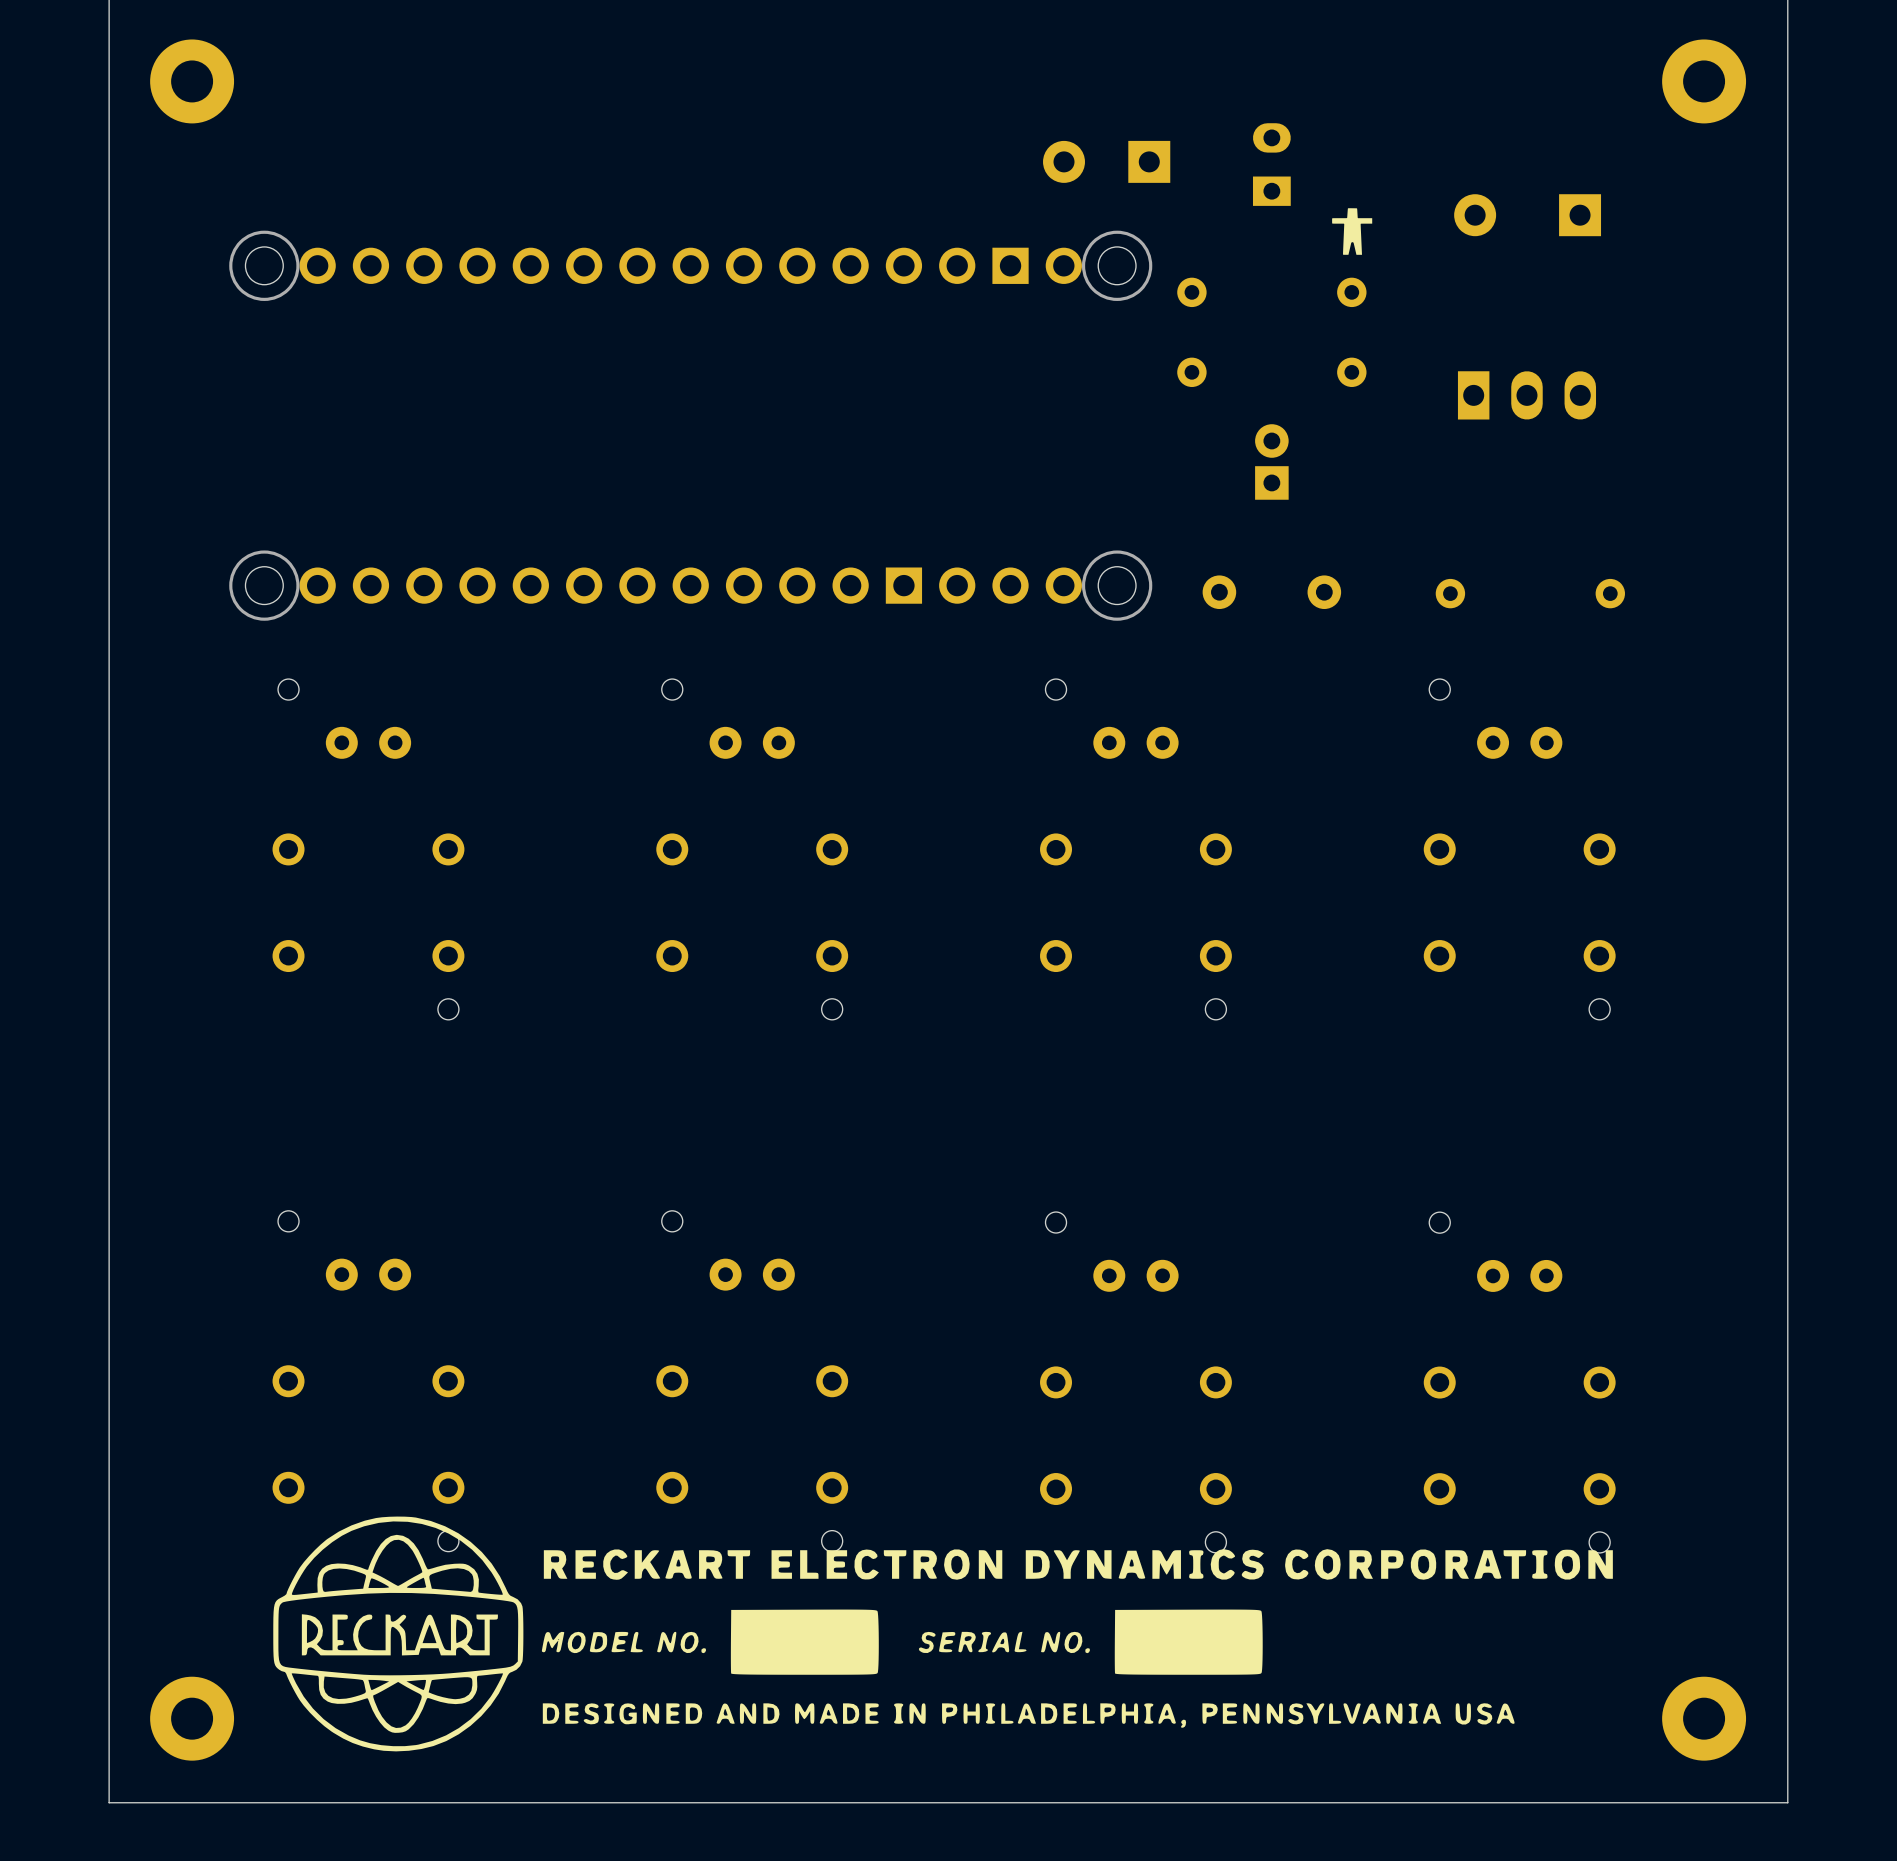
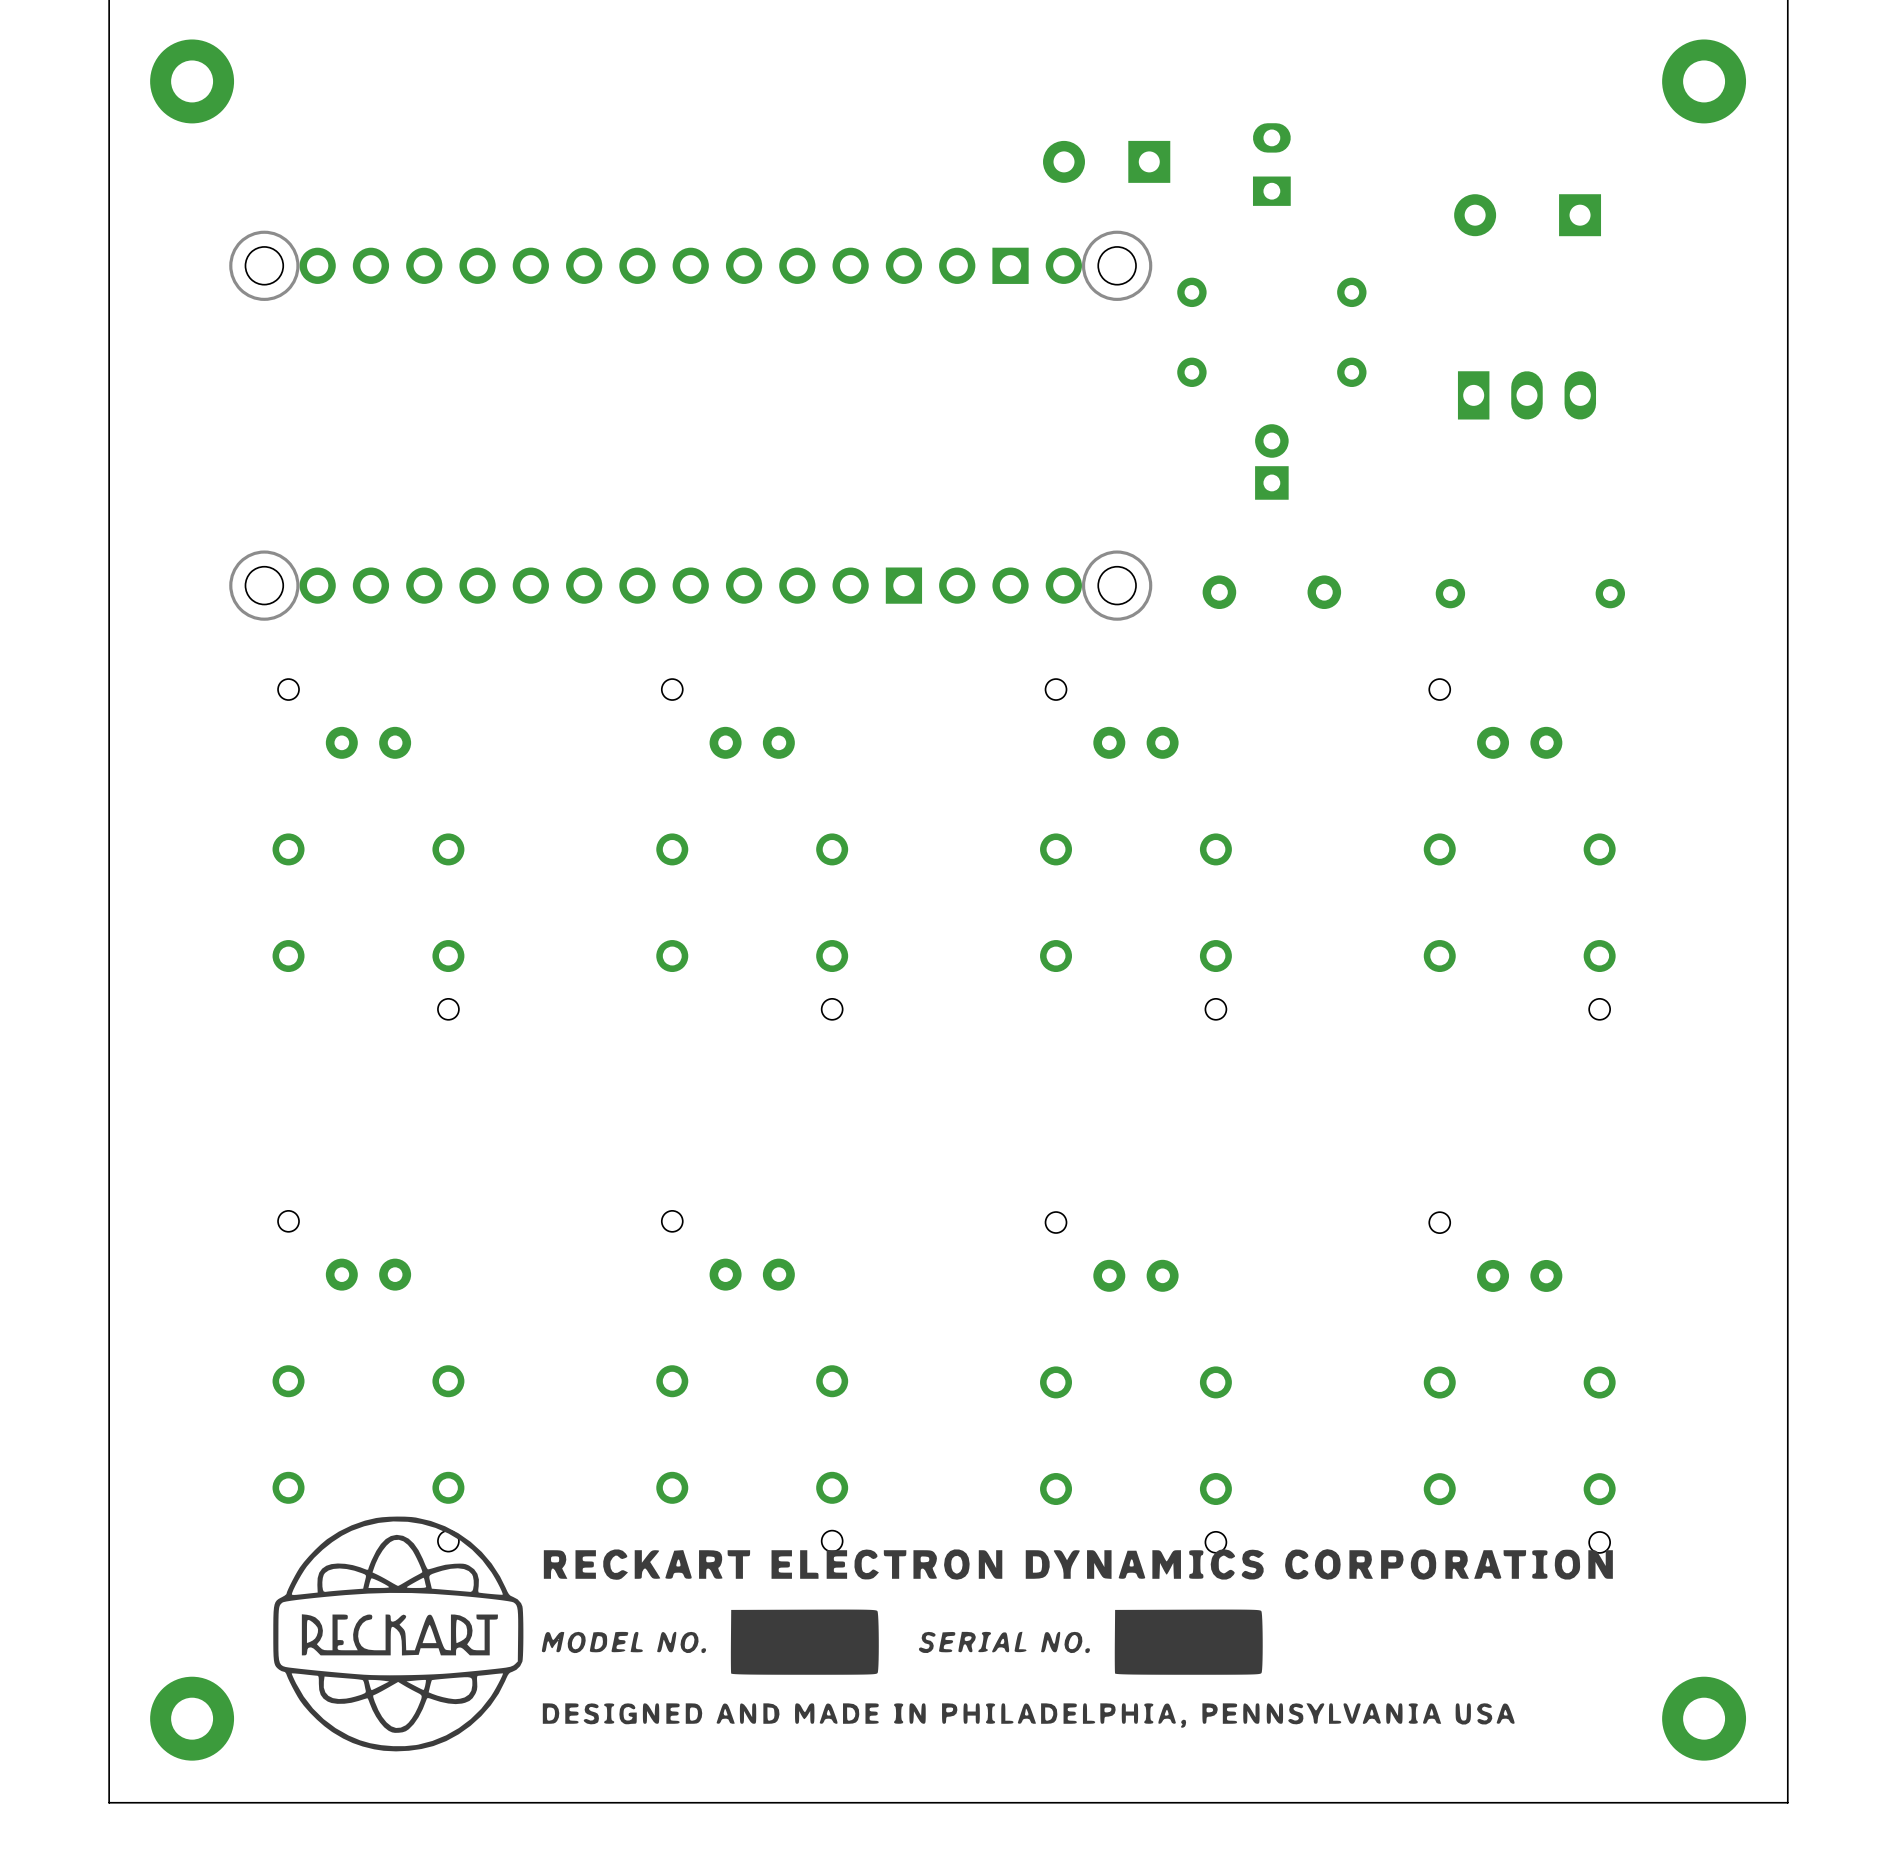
drawing: [1332, 208, 1373, 255] -> none

